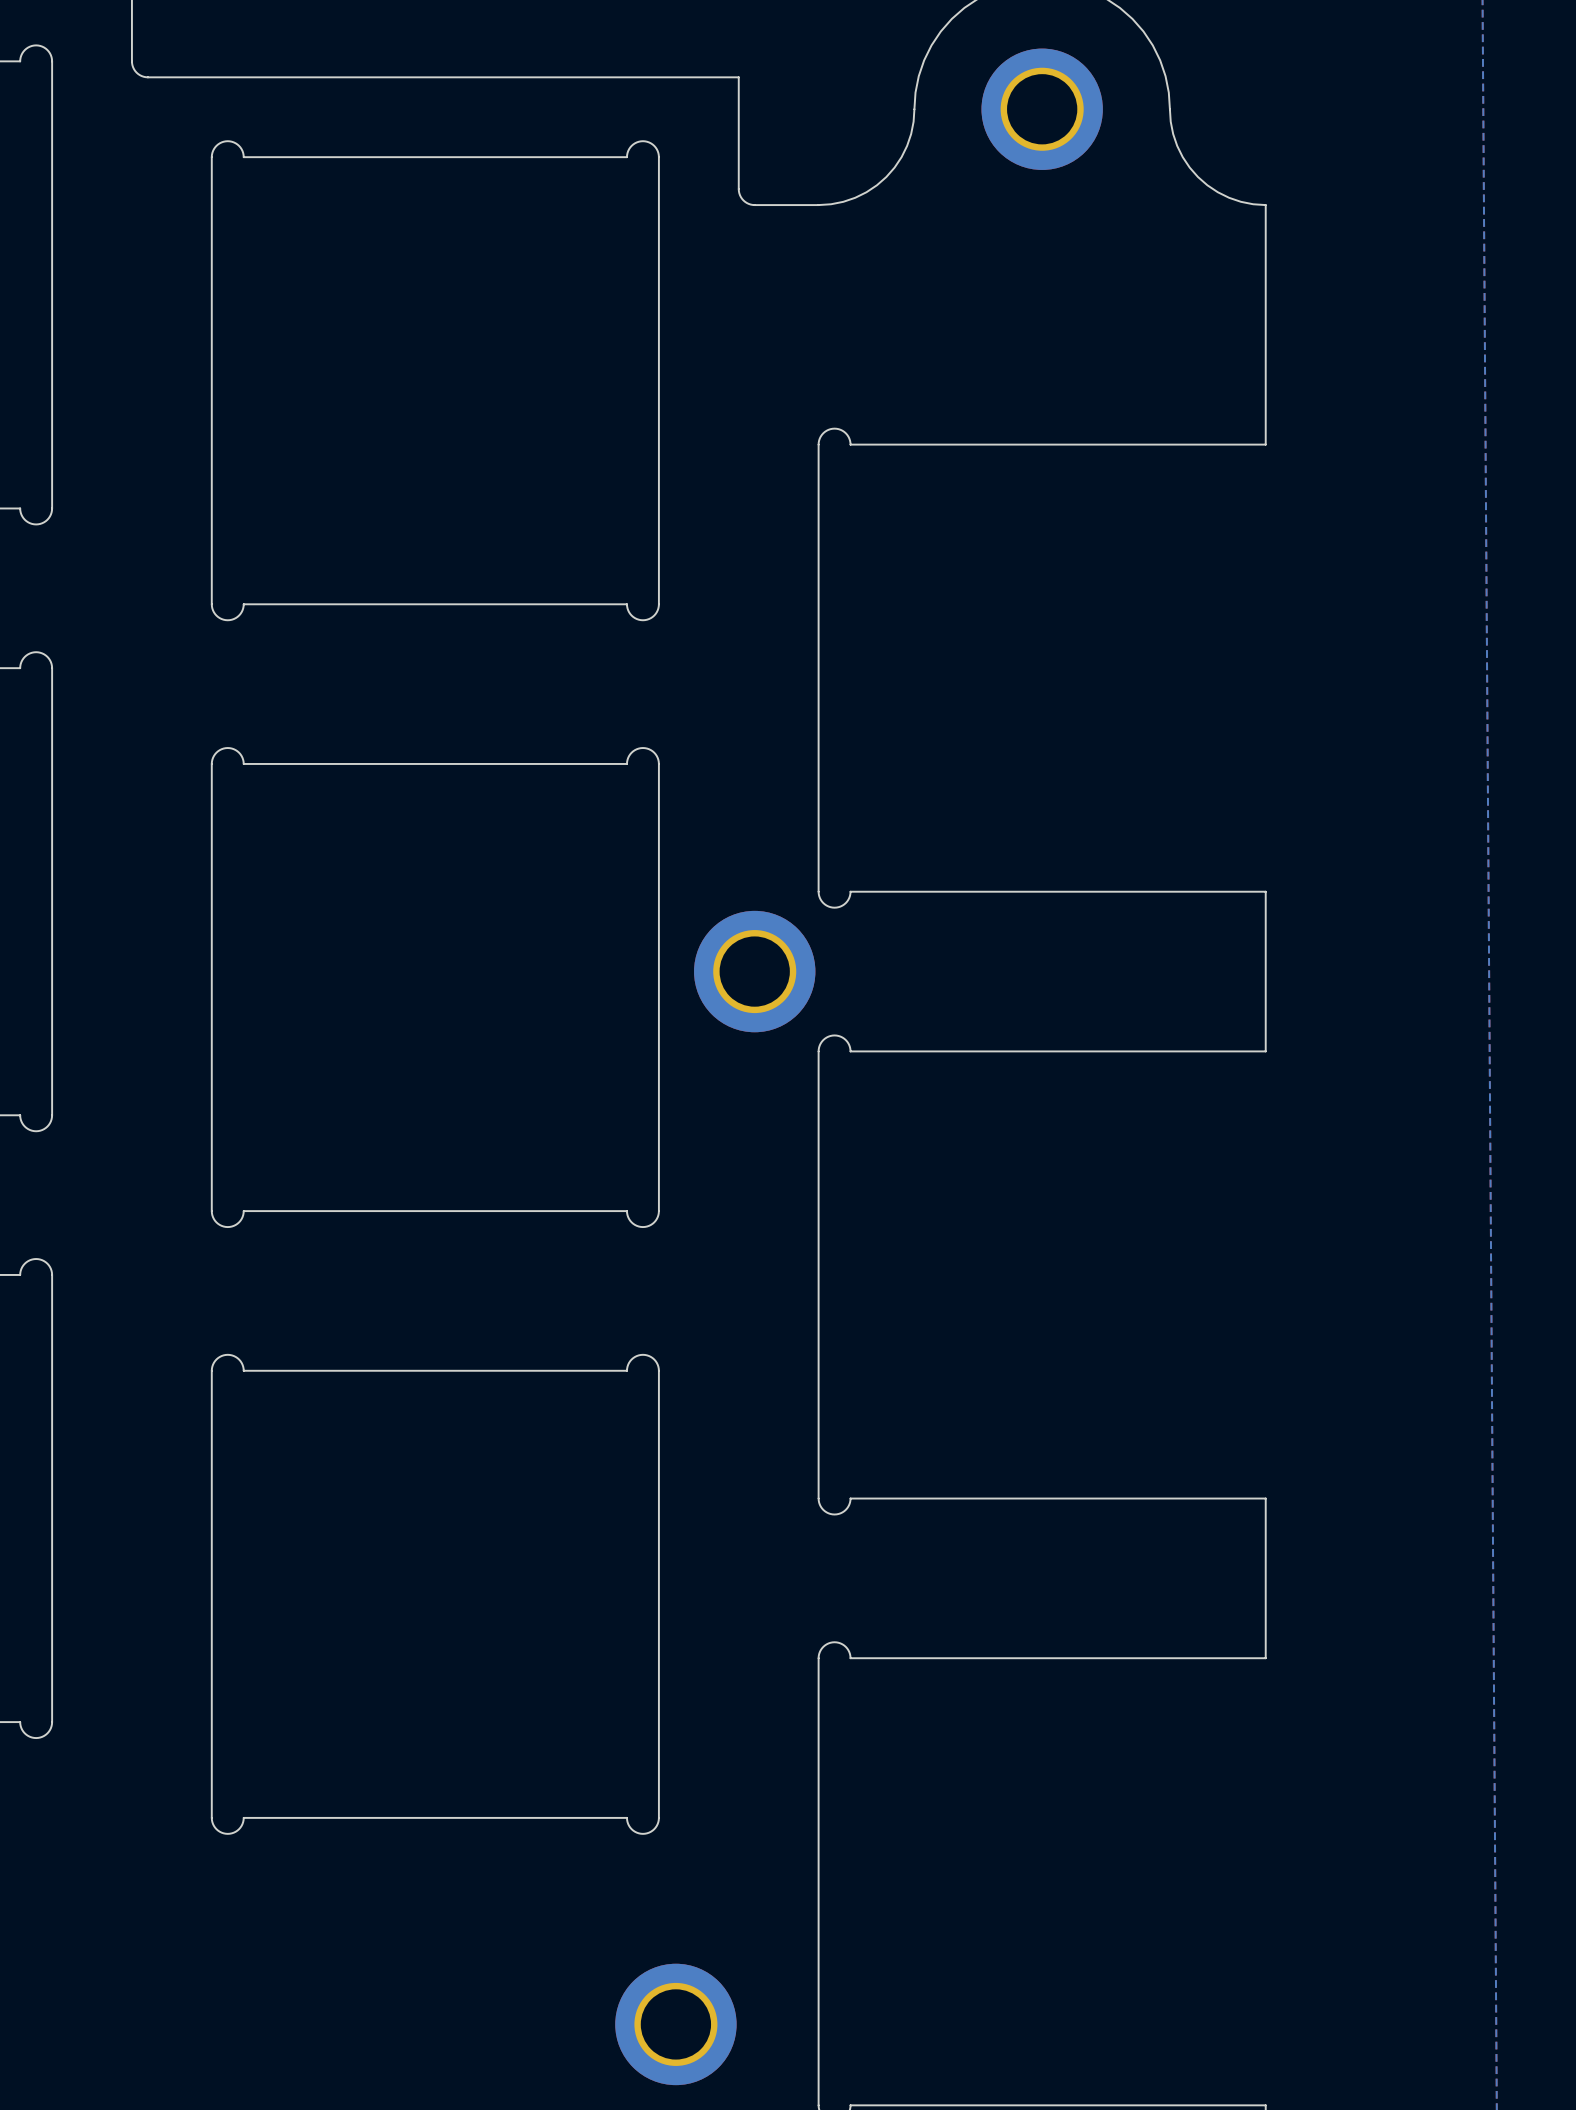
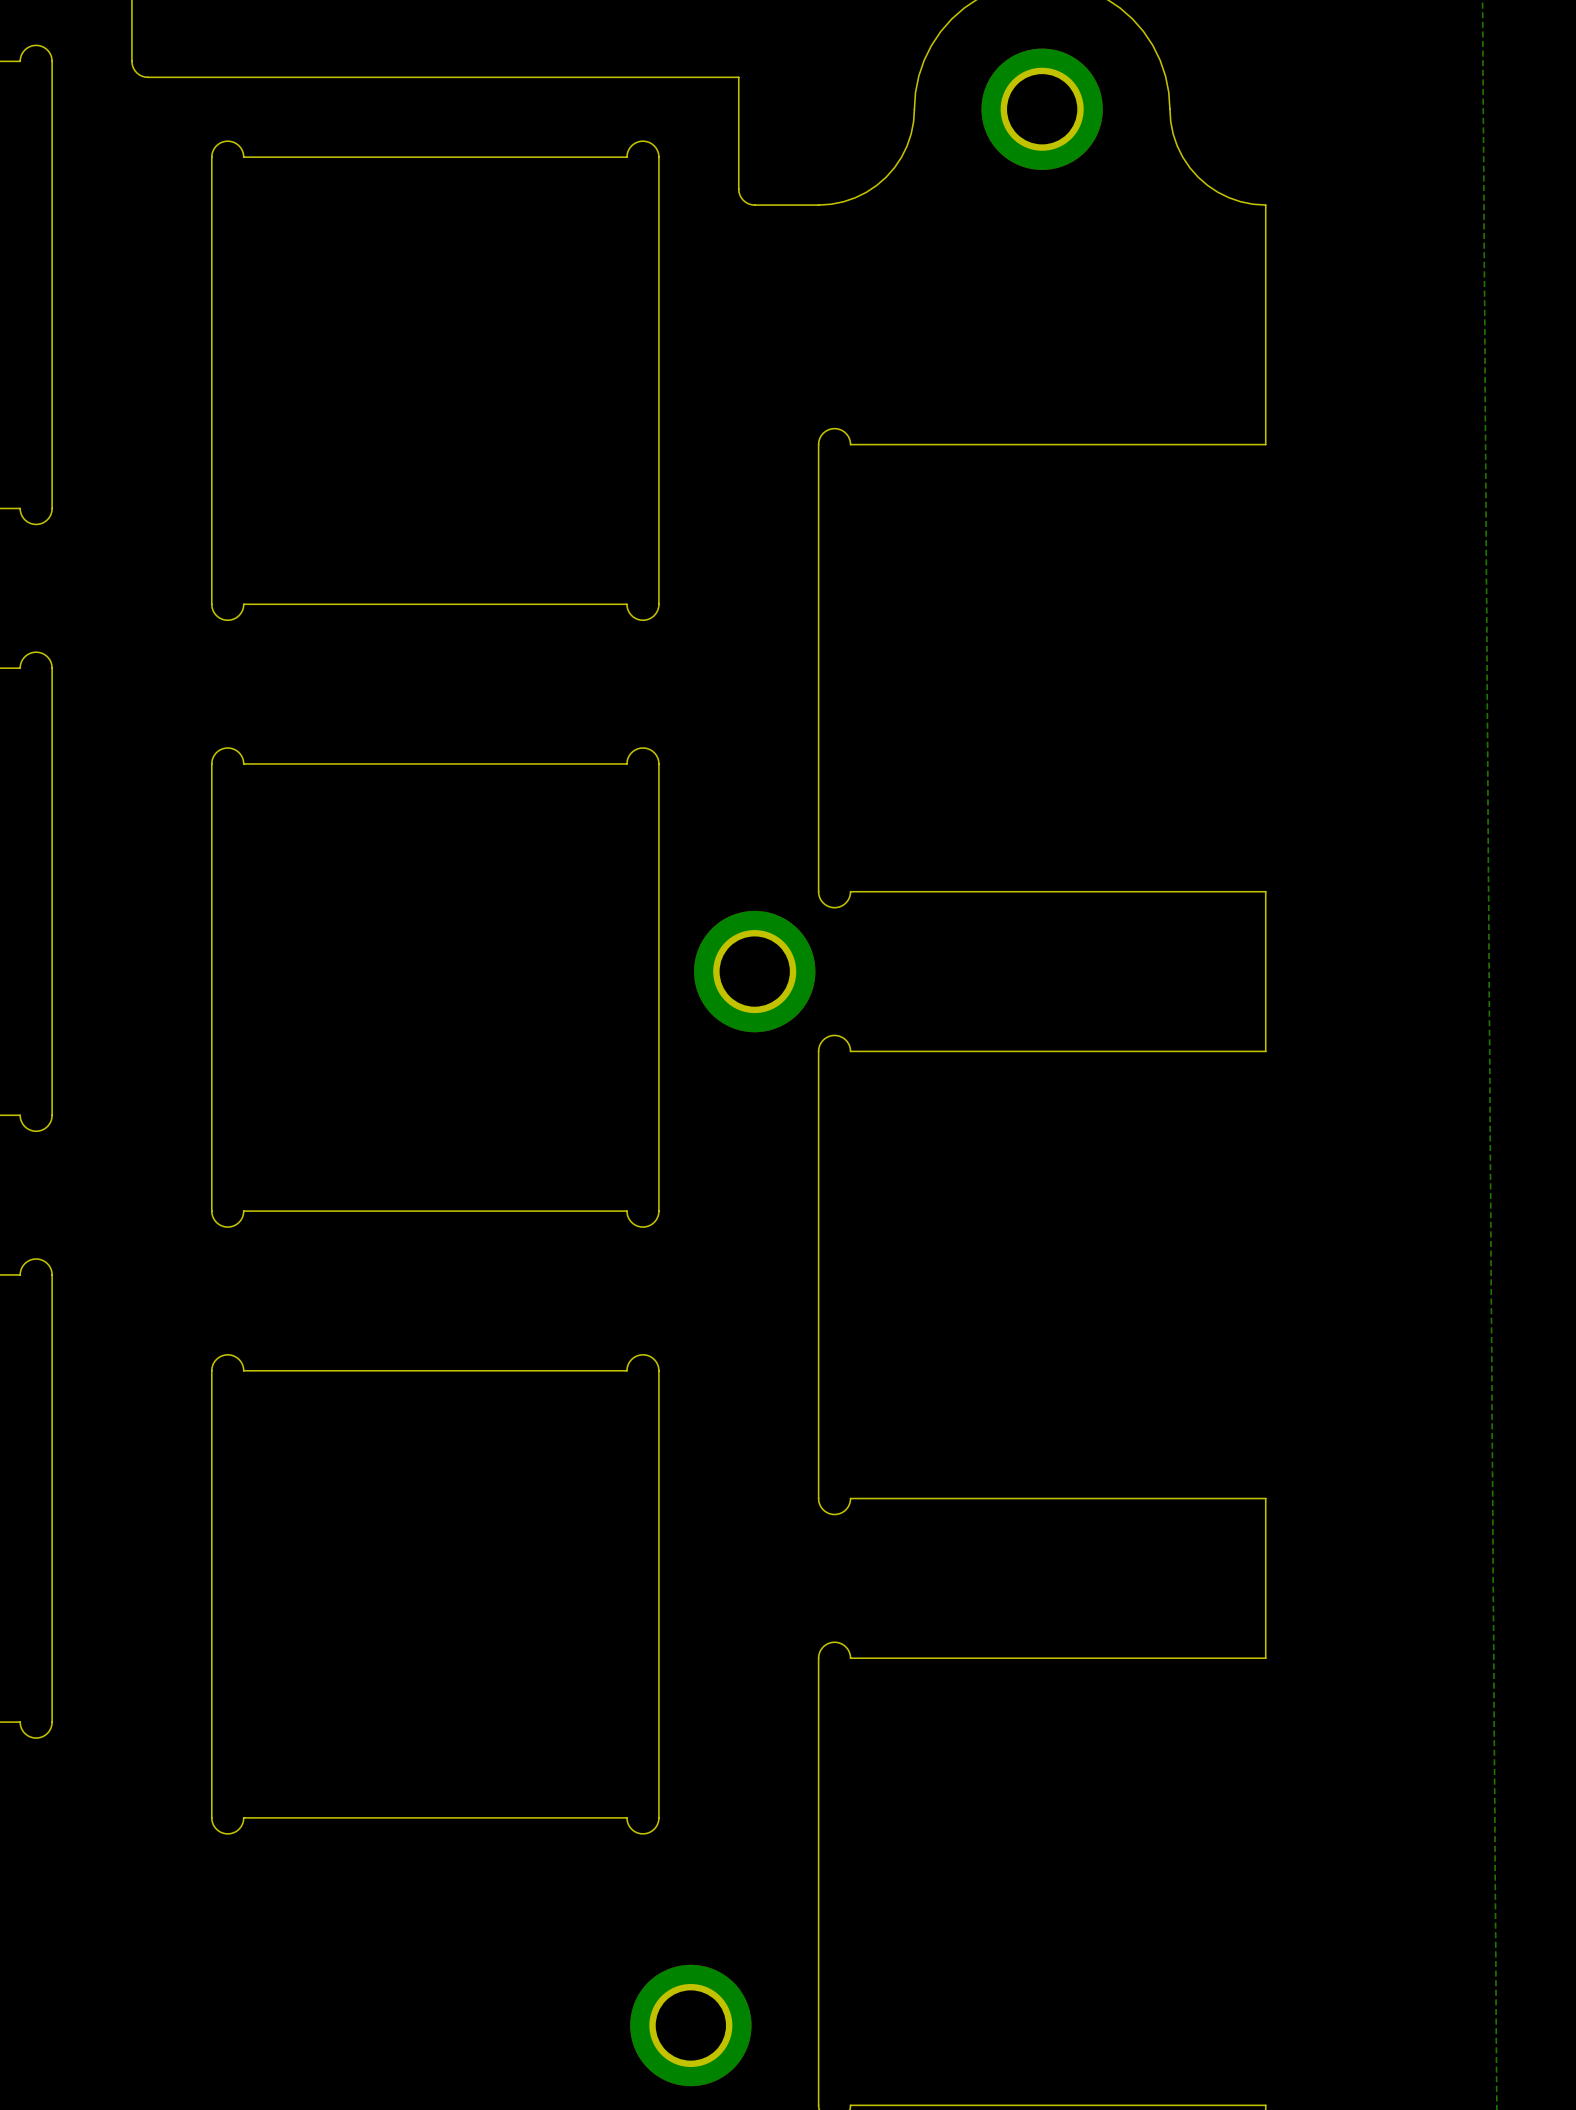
part position: (675, 2024) -> (690, 2025)

